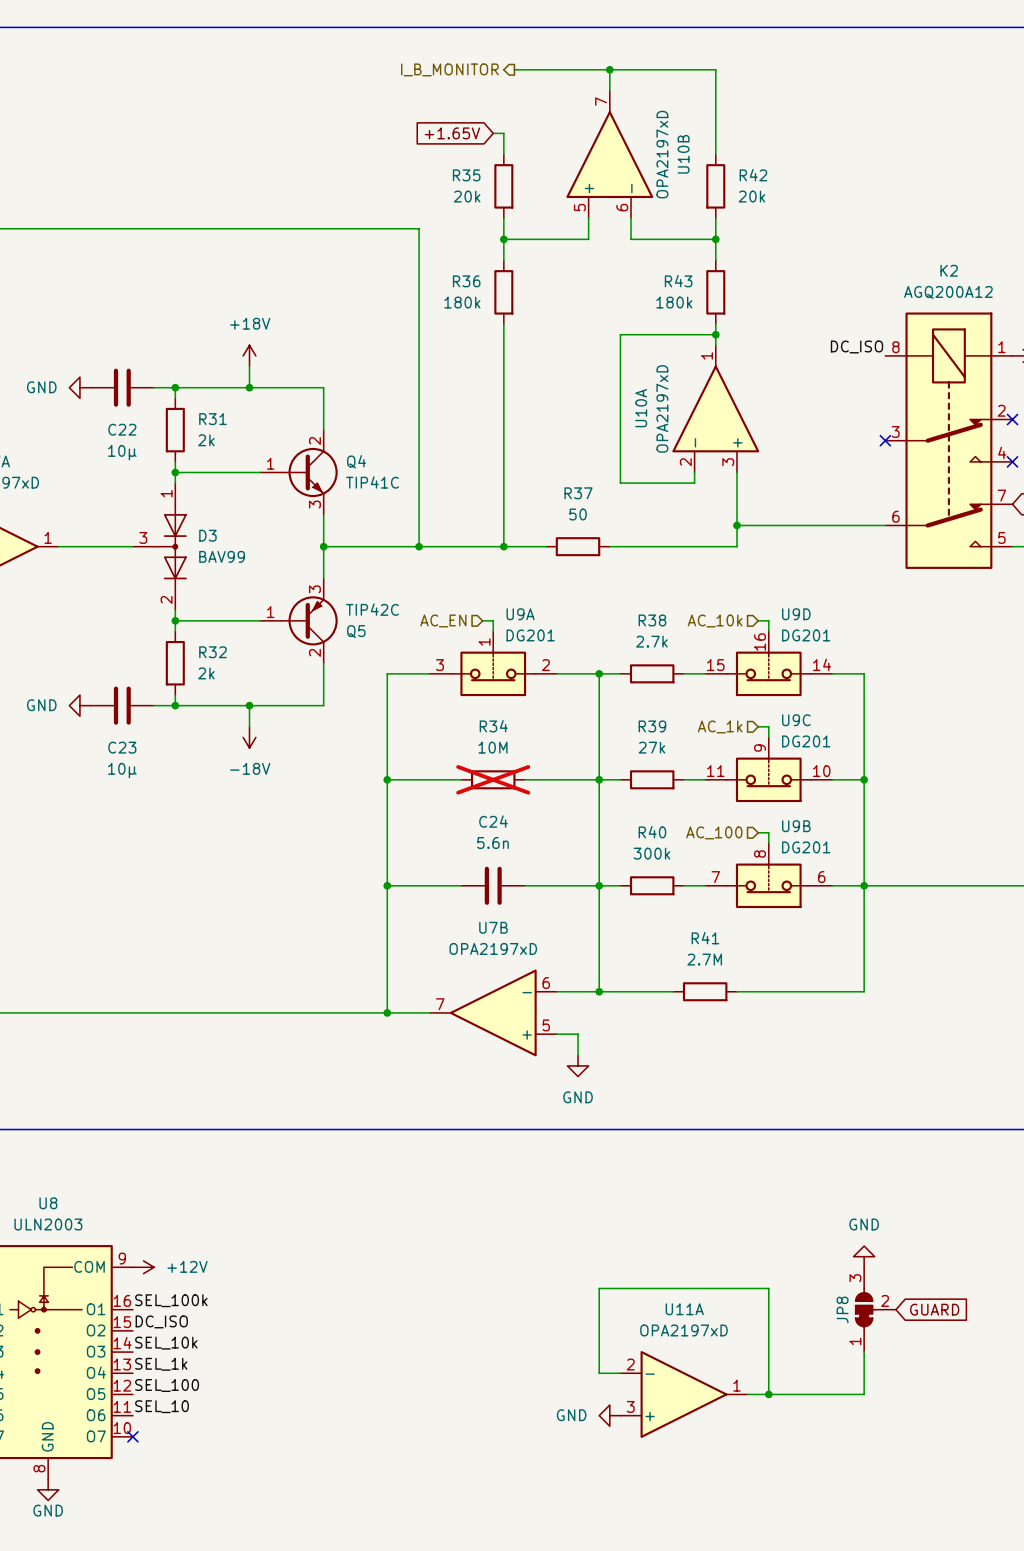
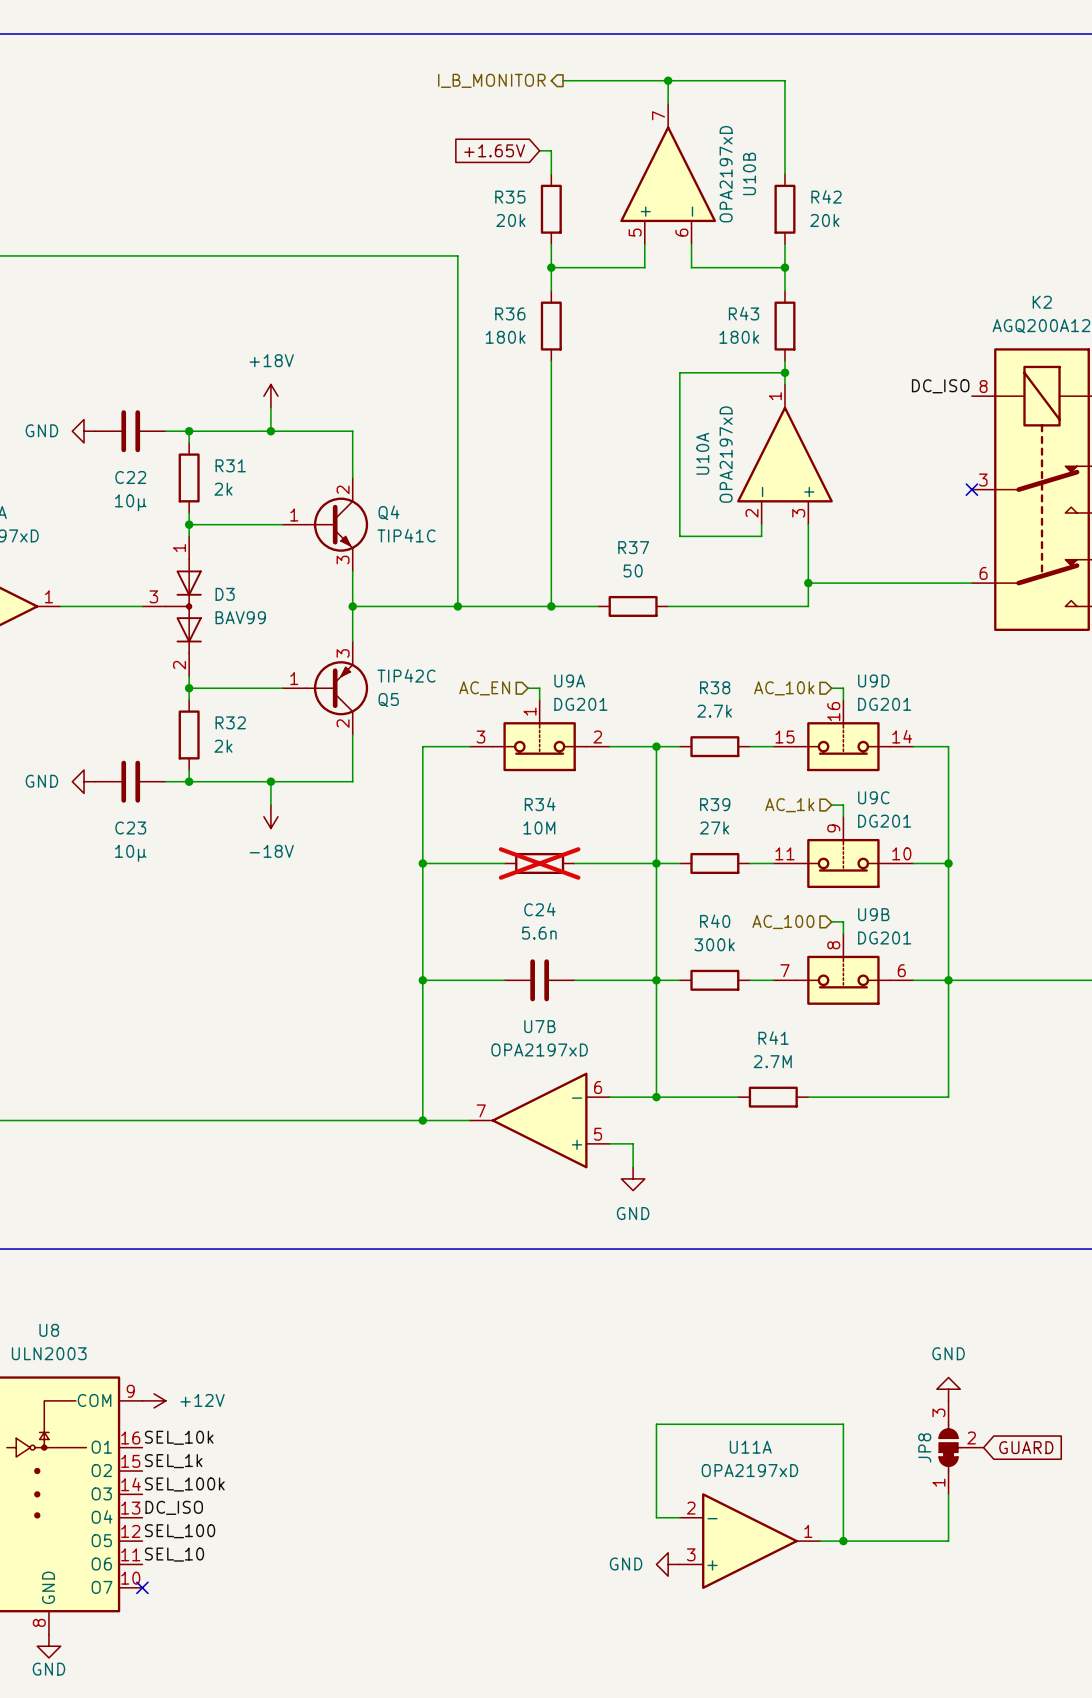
label: SEL_100k (171, 1300) -> SEL_10k (179, 1437)
label: DC_ISO (161, 1321) -> SEL_1k (173, 1461)
label: SEL_10k (166, 1343) -> SEL_100k (184, 1484)
label: SEL_1k (161, 1364) -> DC_ISO (174, 1507)

